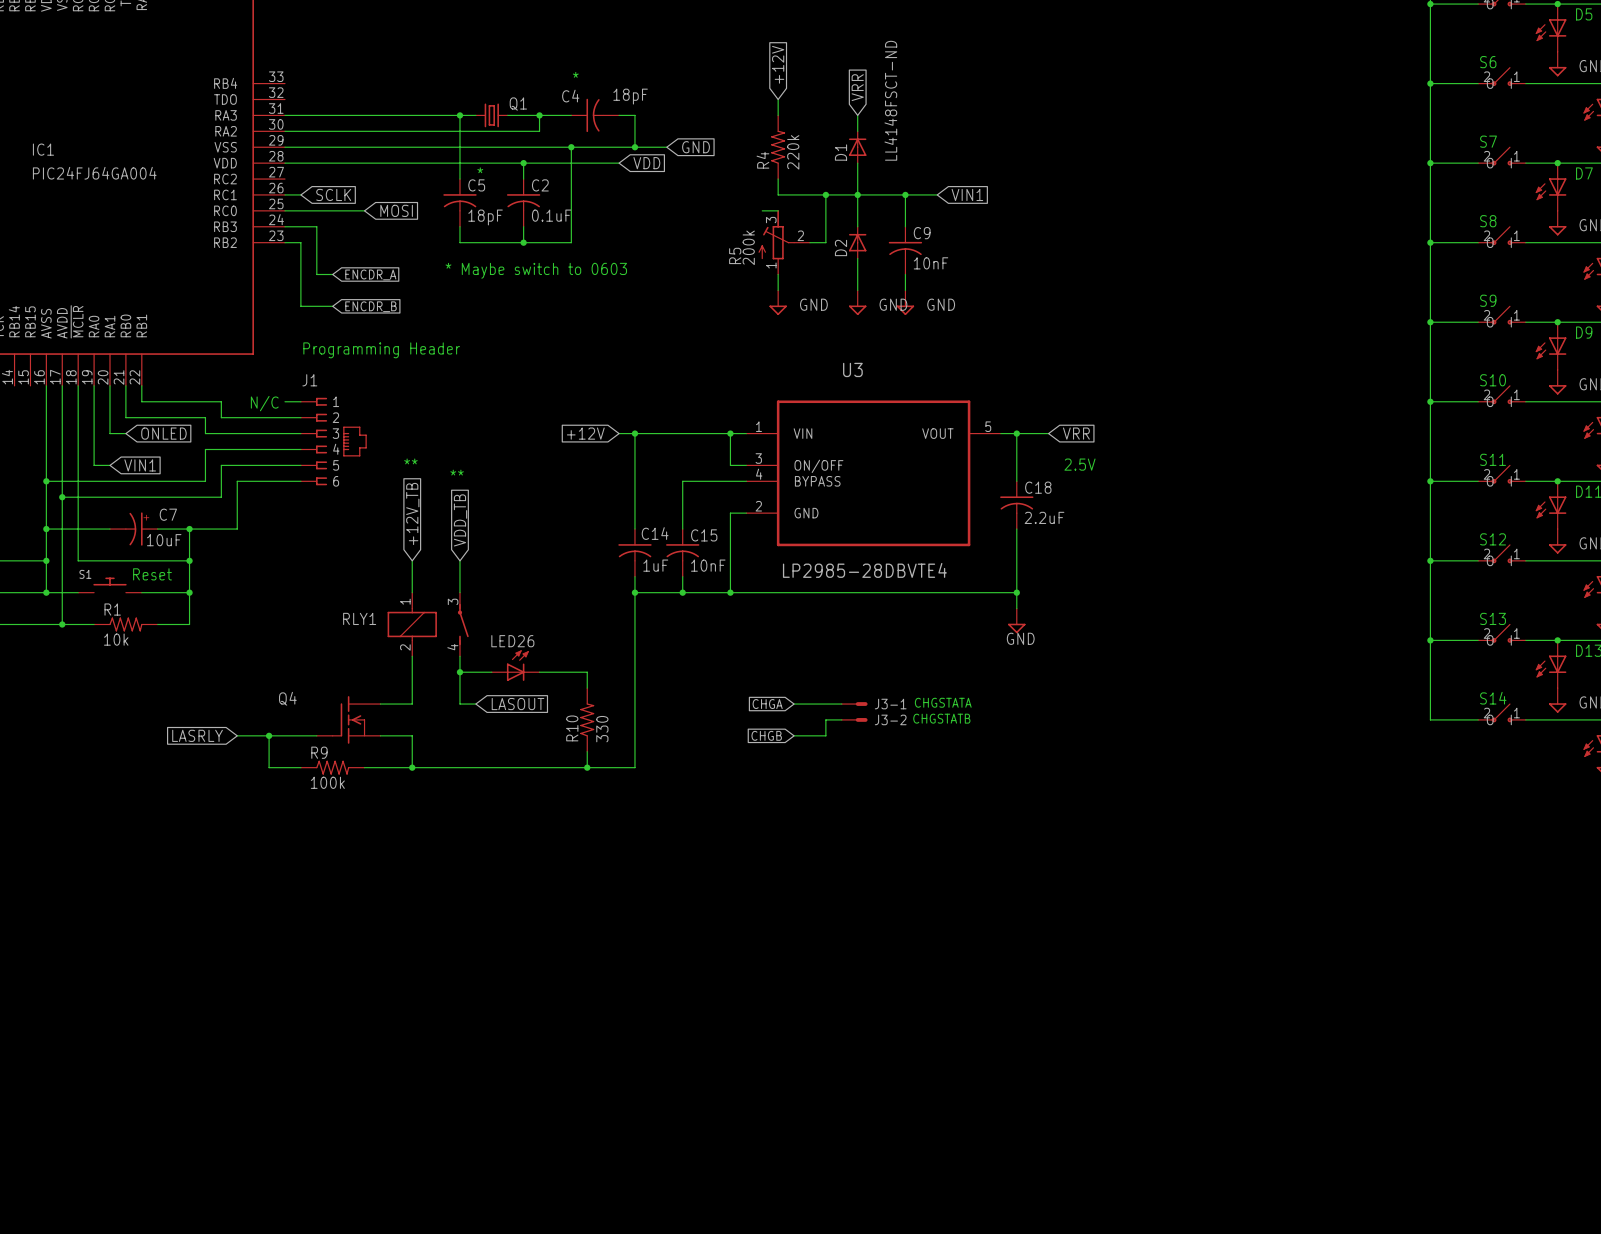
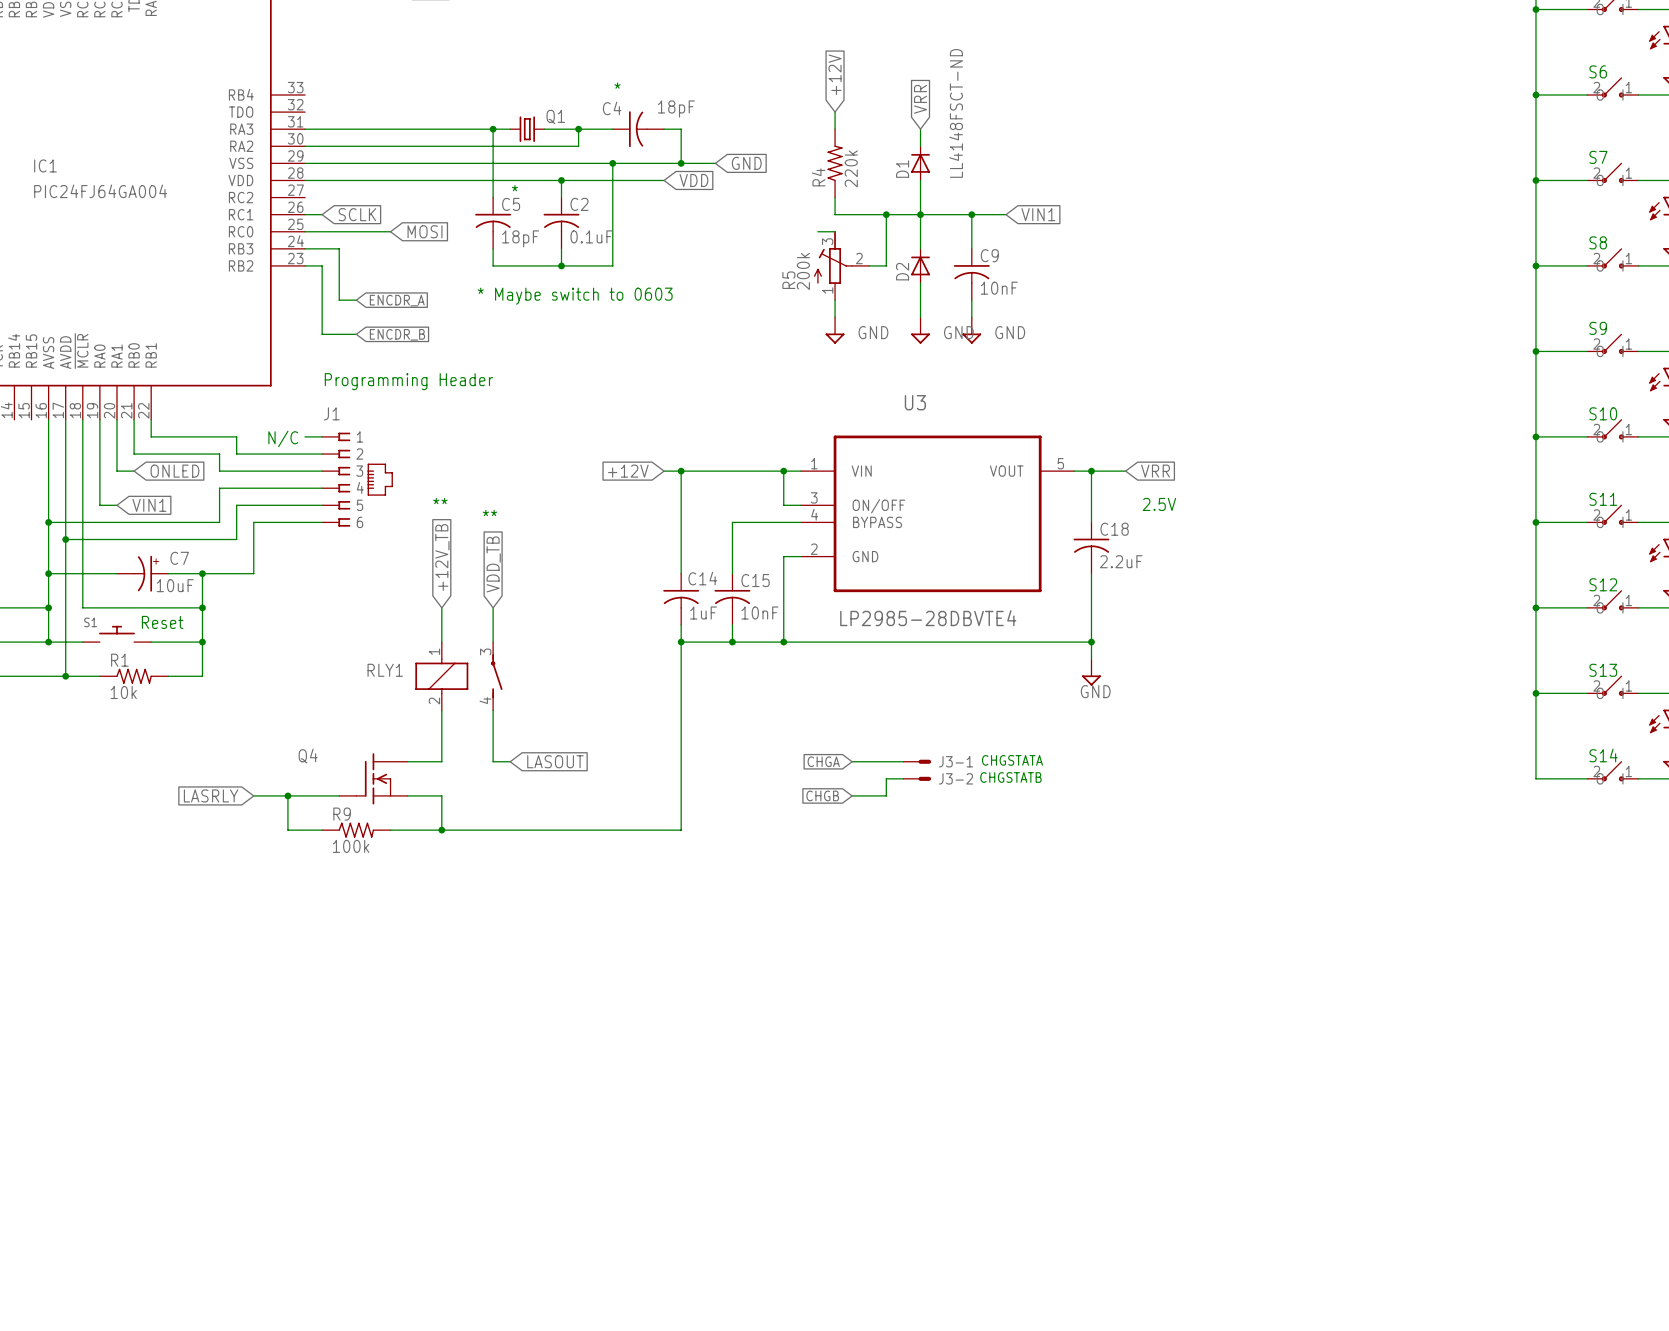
LED26: (515, 665) -> none
wire: (459, 672) (491, 672) -> none
junction: (459, 672) -> none
wire: (539, 672) (587, 672) (587, 688) -> none
R10: 330 (587, 719) -> none
wire: (587, 751) (587, 767) -> none
junction: (587, 767) -> none

